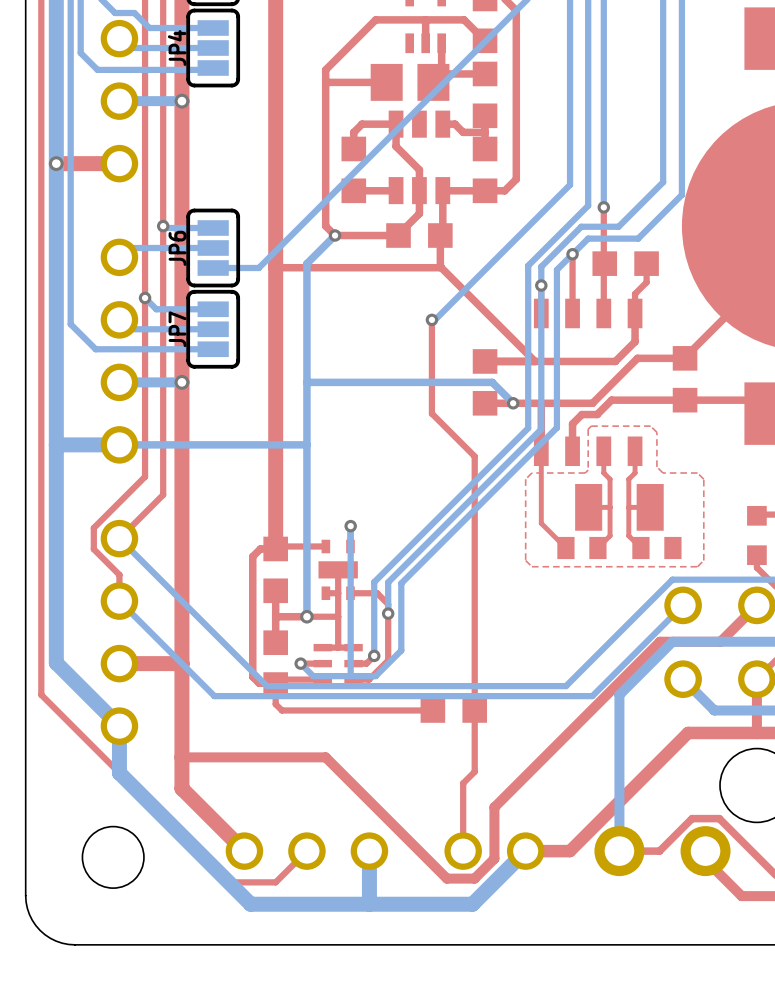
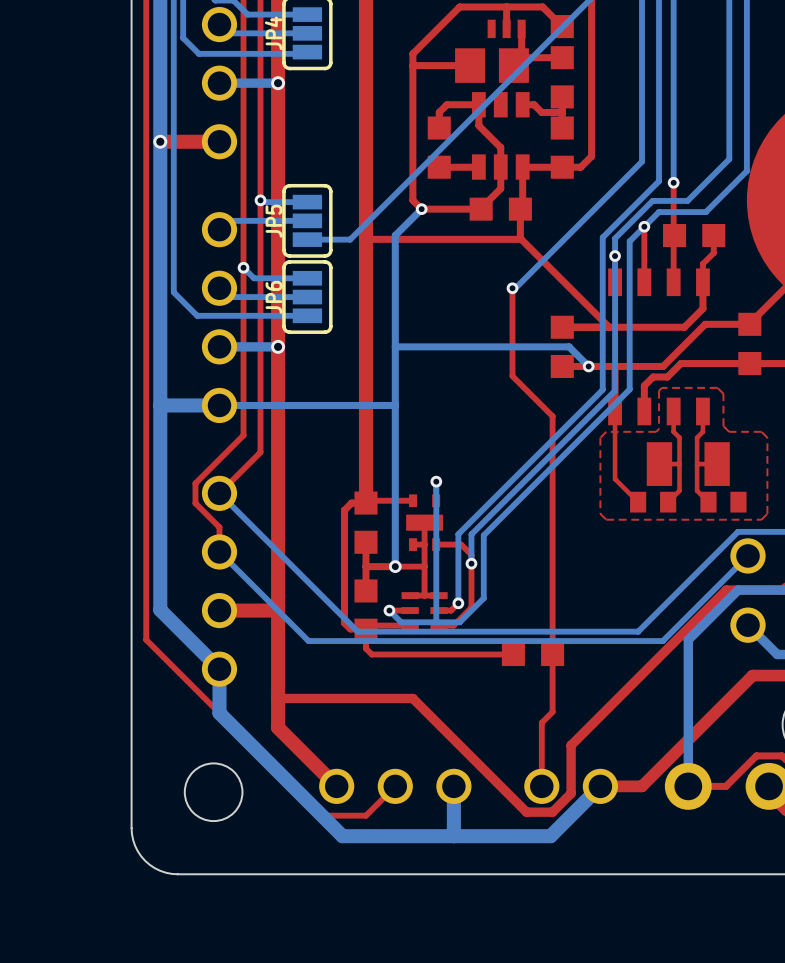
JP6 name: JP6 (177, 248) -> JP5 (273, 221)
JP7 name: JP7 (177, 329) -> JP6 (273, 297)

